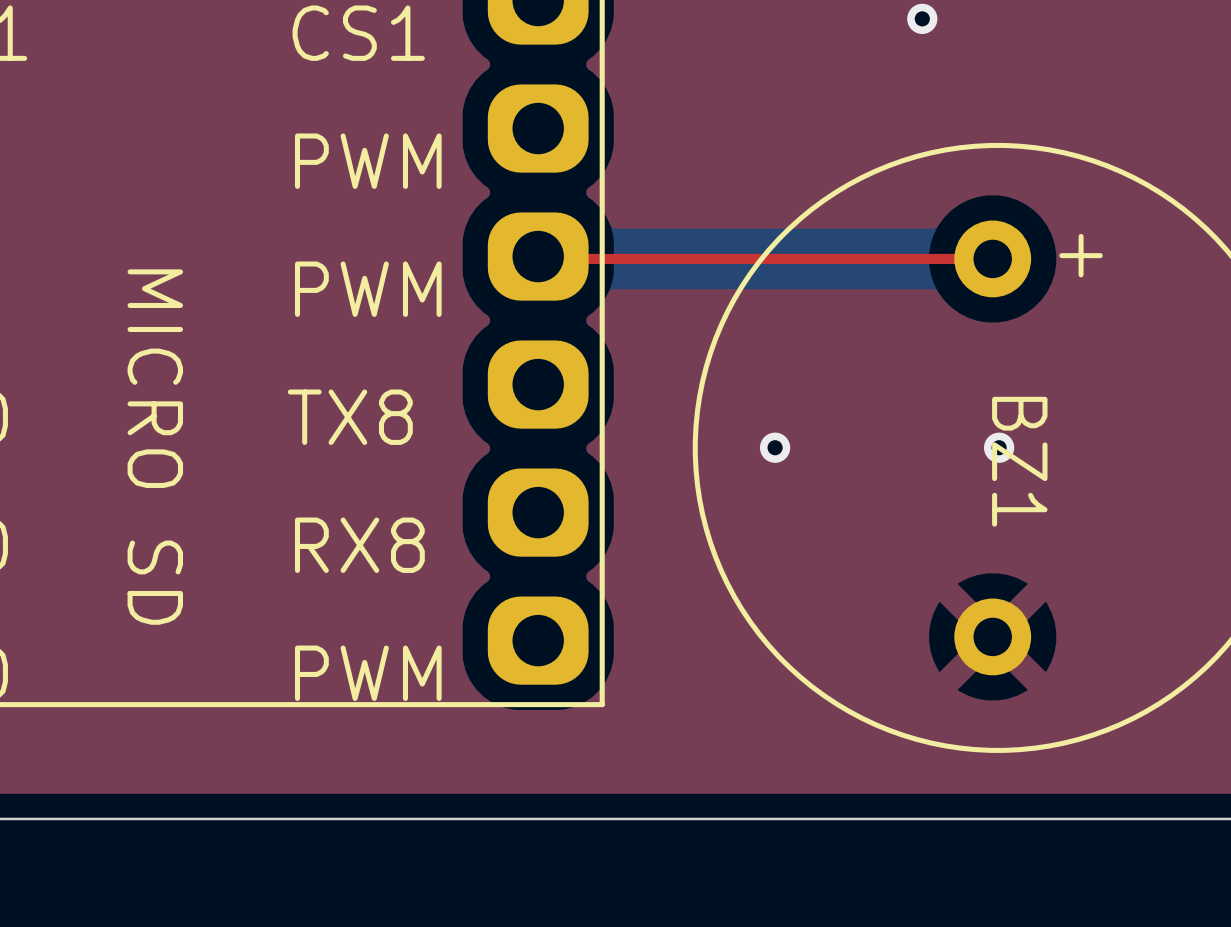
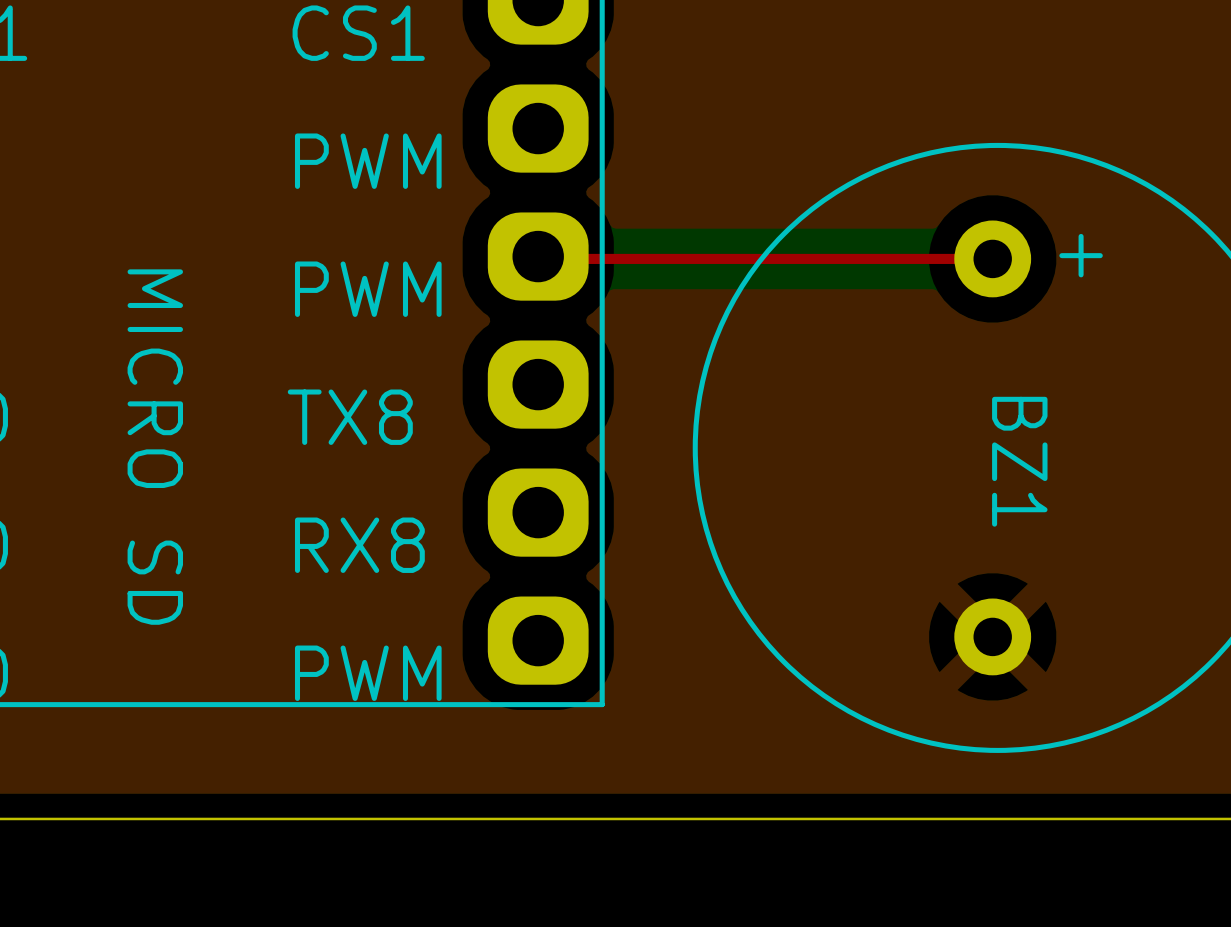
via: (922, 18) -> none
via: (775, 447) -> none
via: (999, 447) -> none

